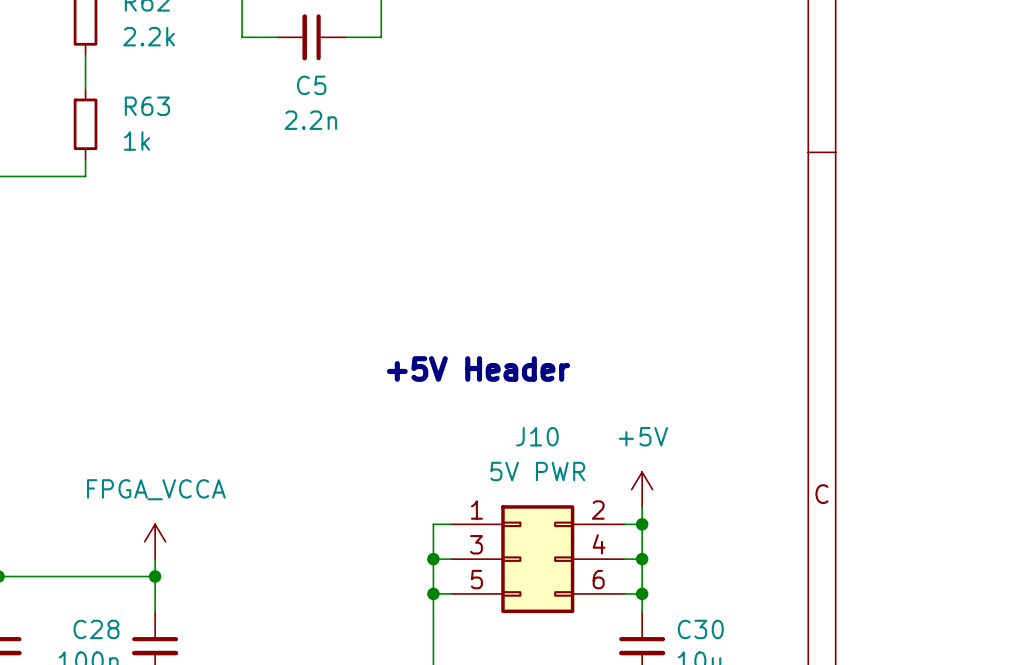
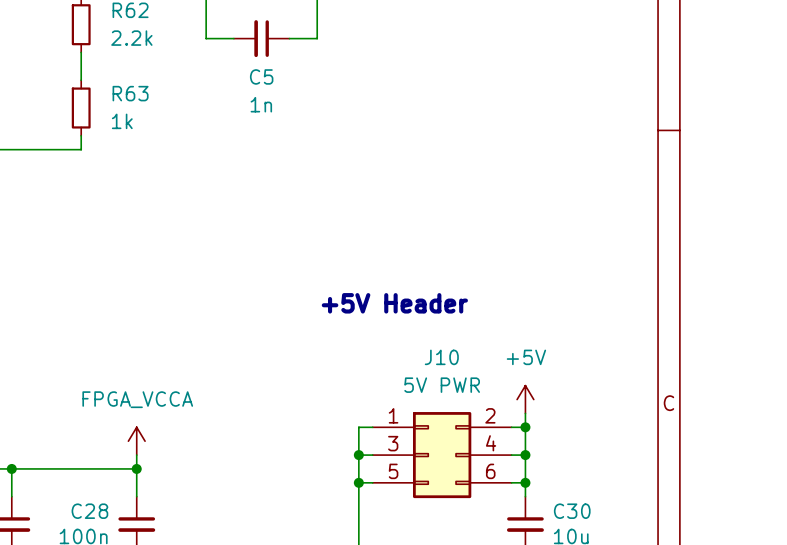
C5 value: 2.2n (310, 120) -> 1n (261, 104)

